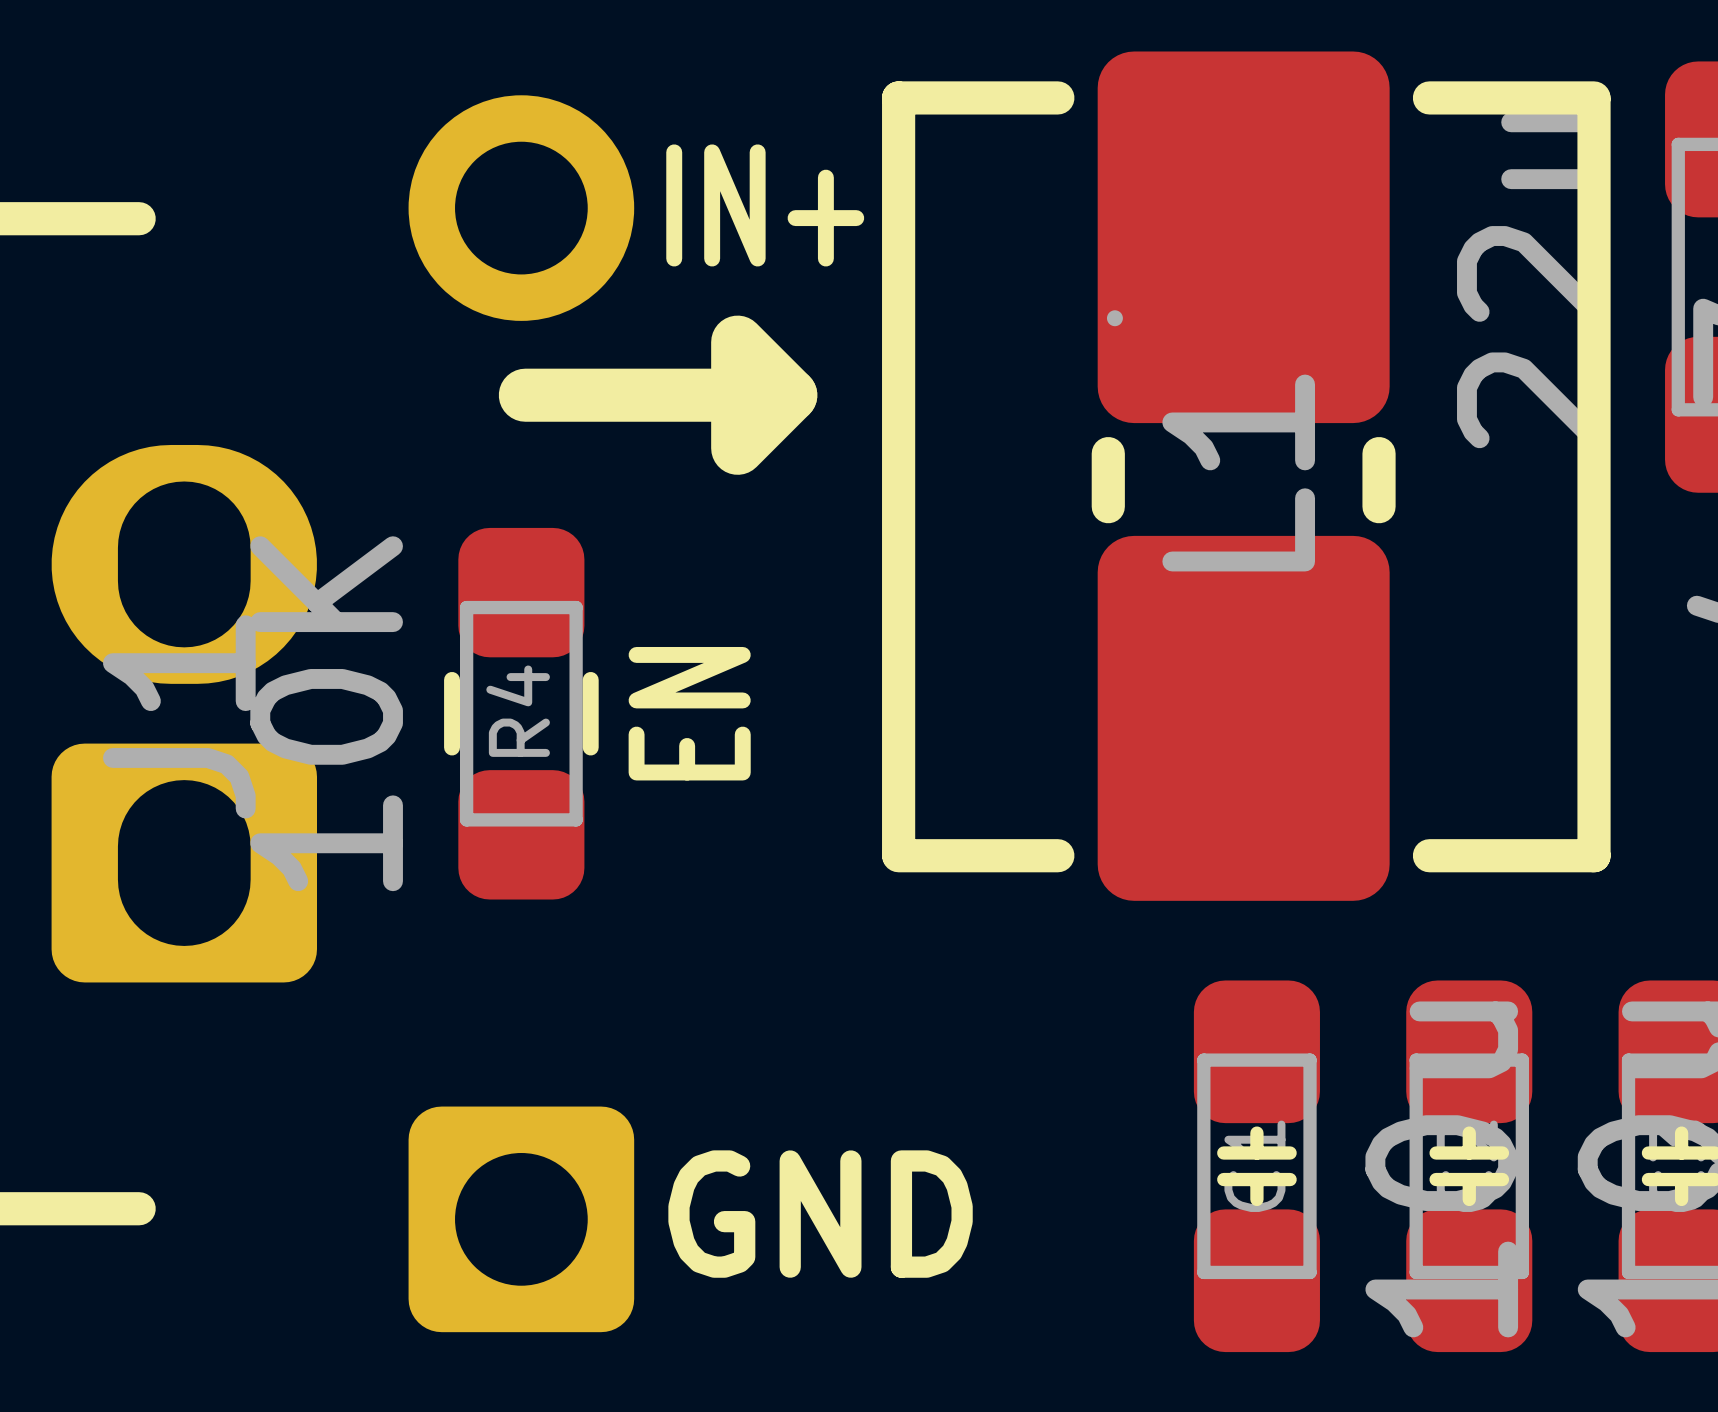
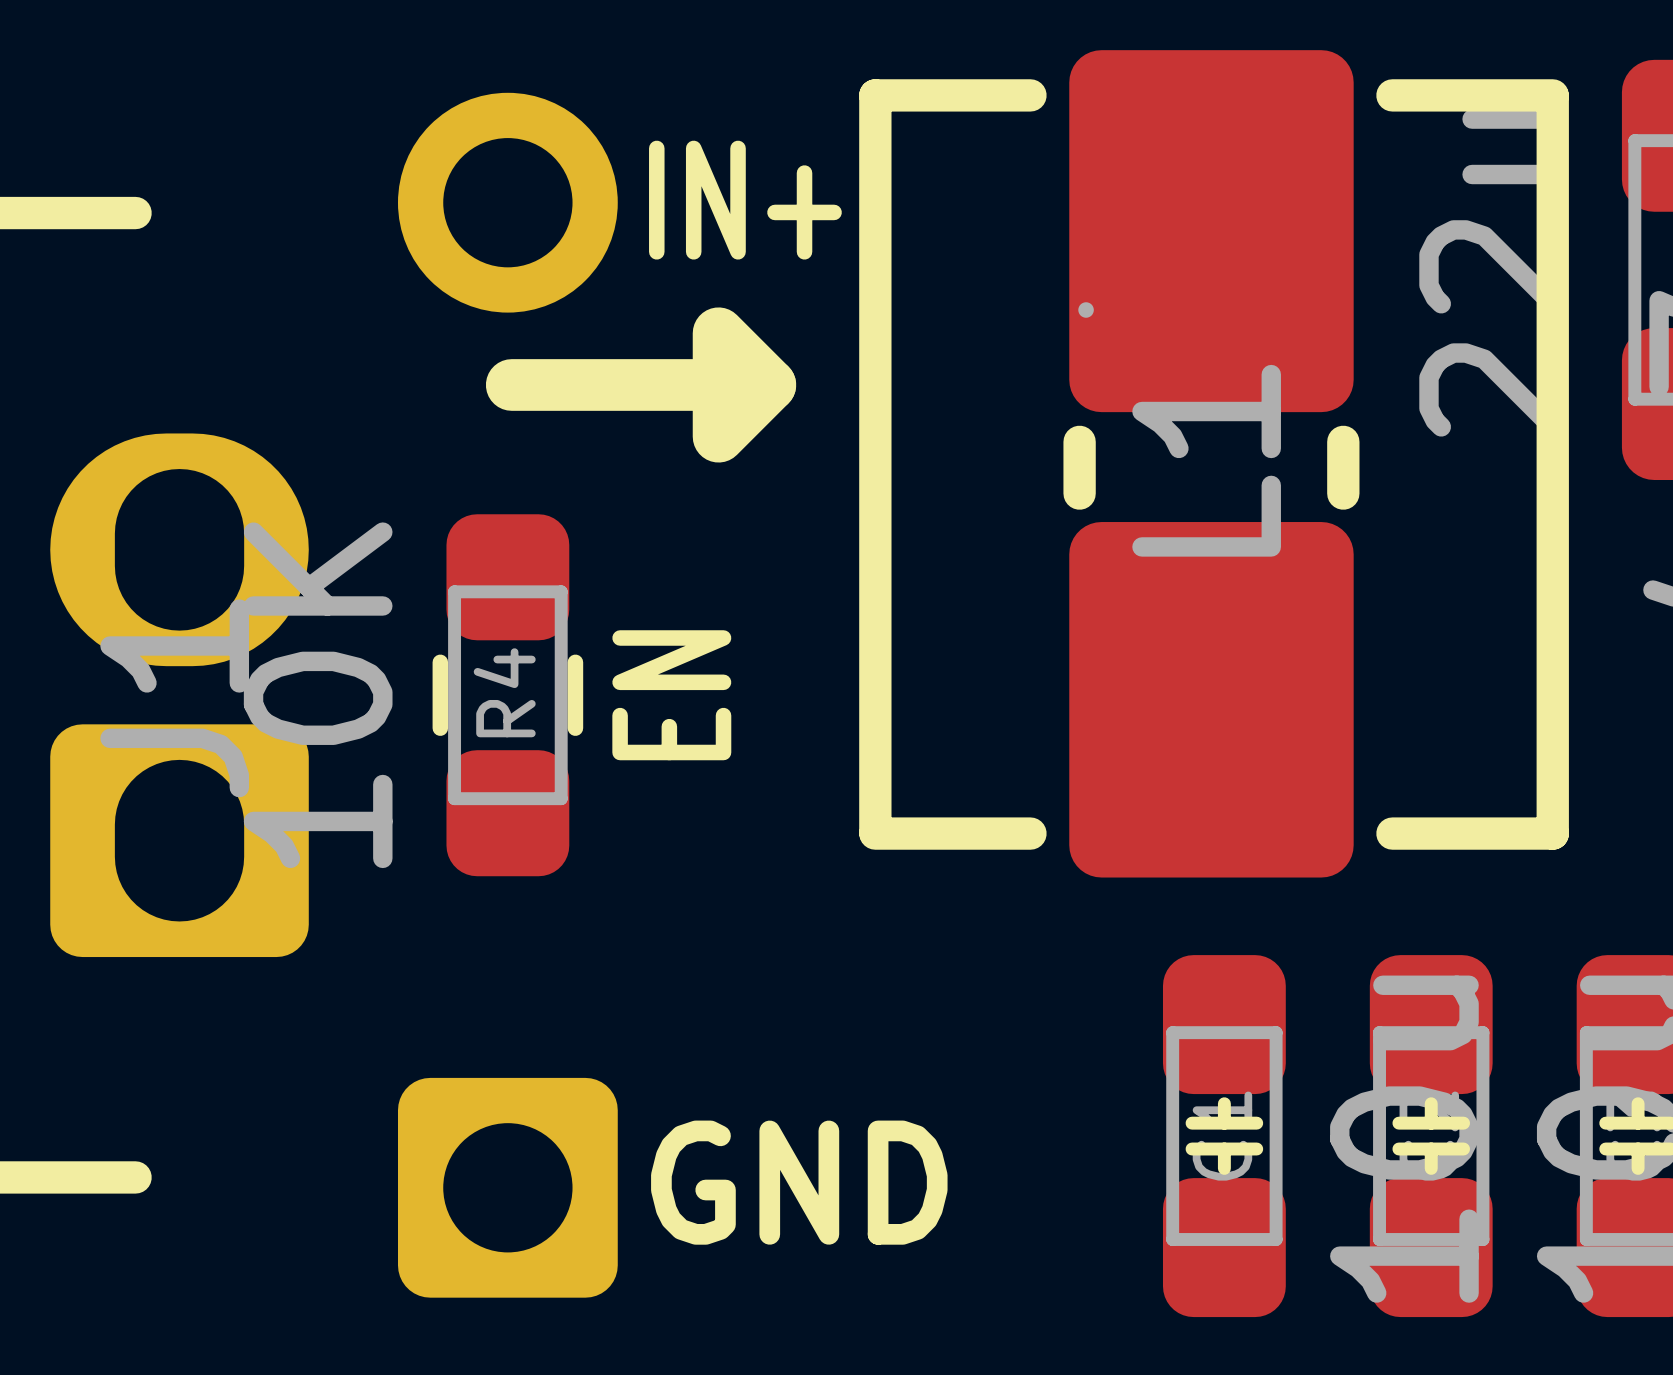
L1 footprint: [882, 51, 1611, 901] -> [859, 50, 1569, 878]

